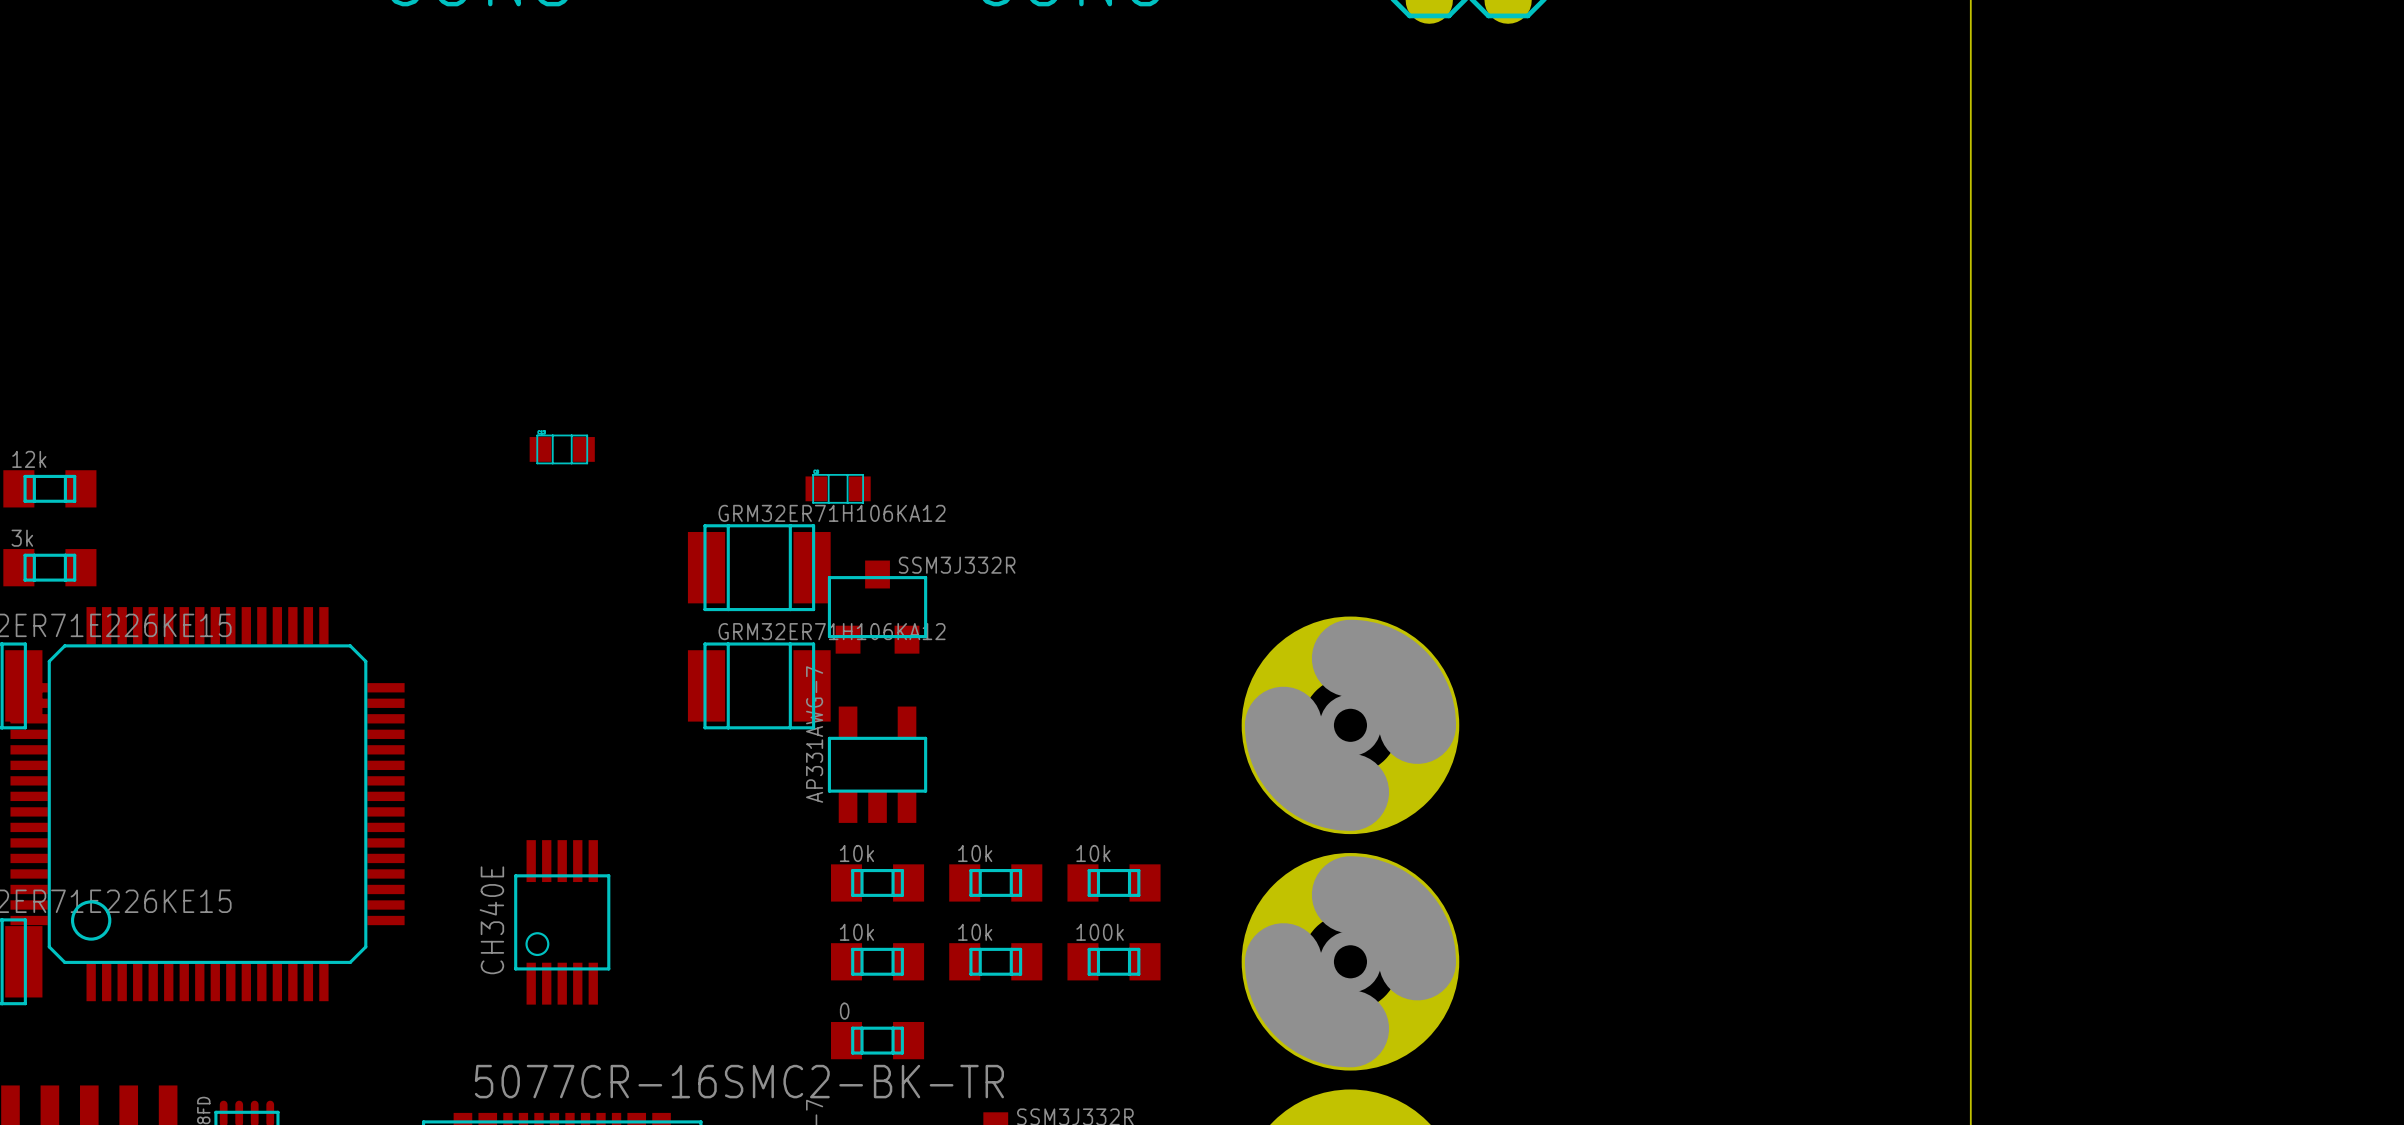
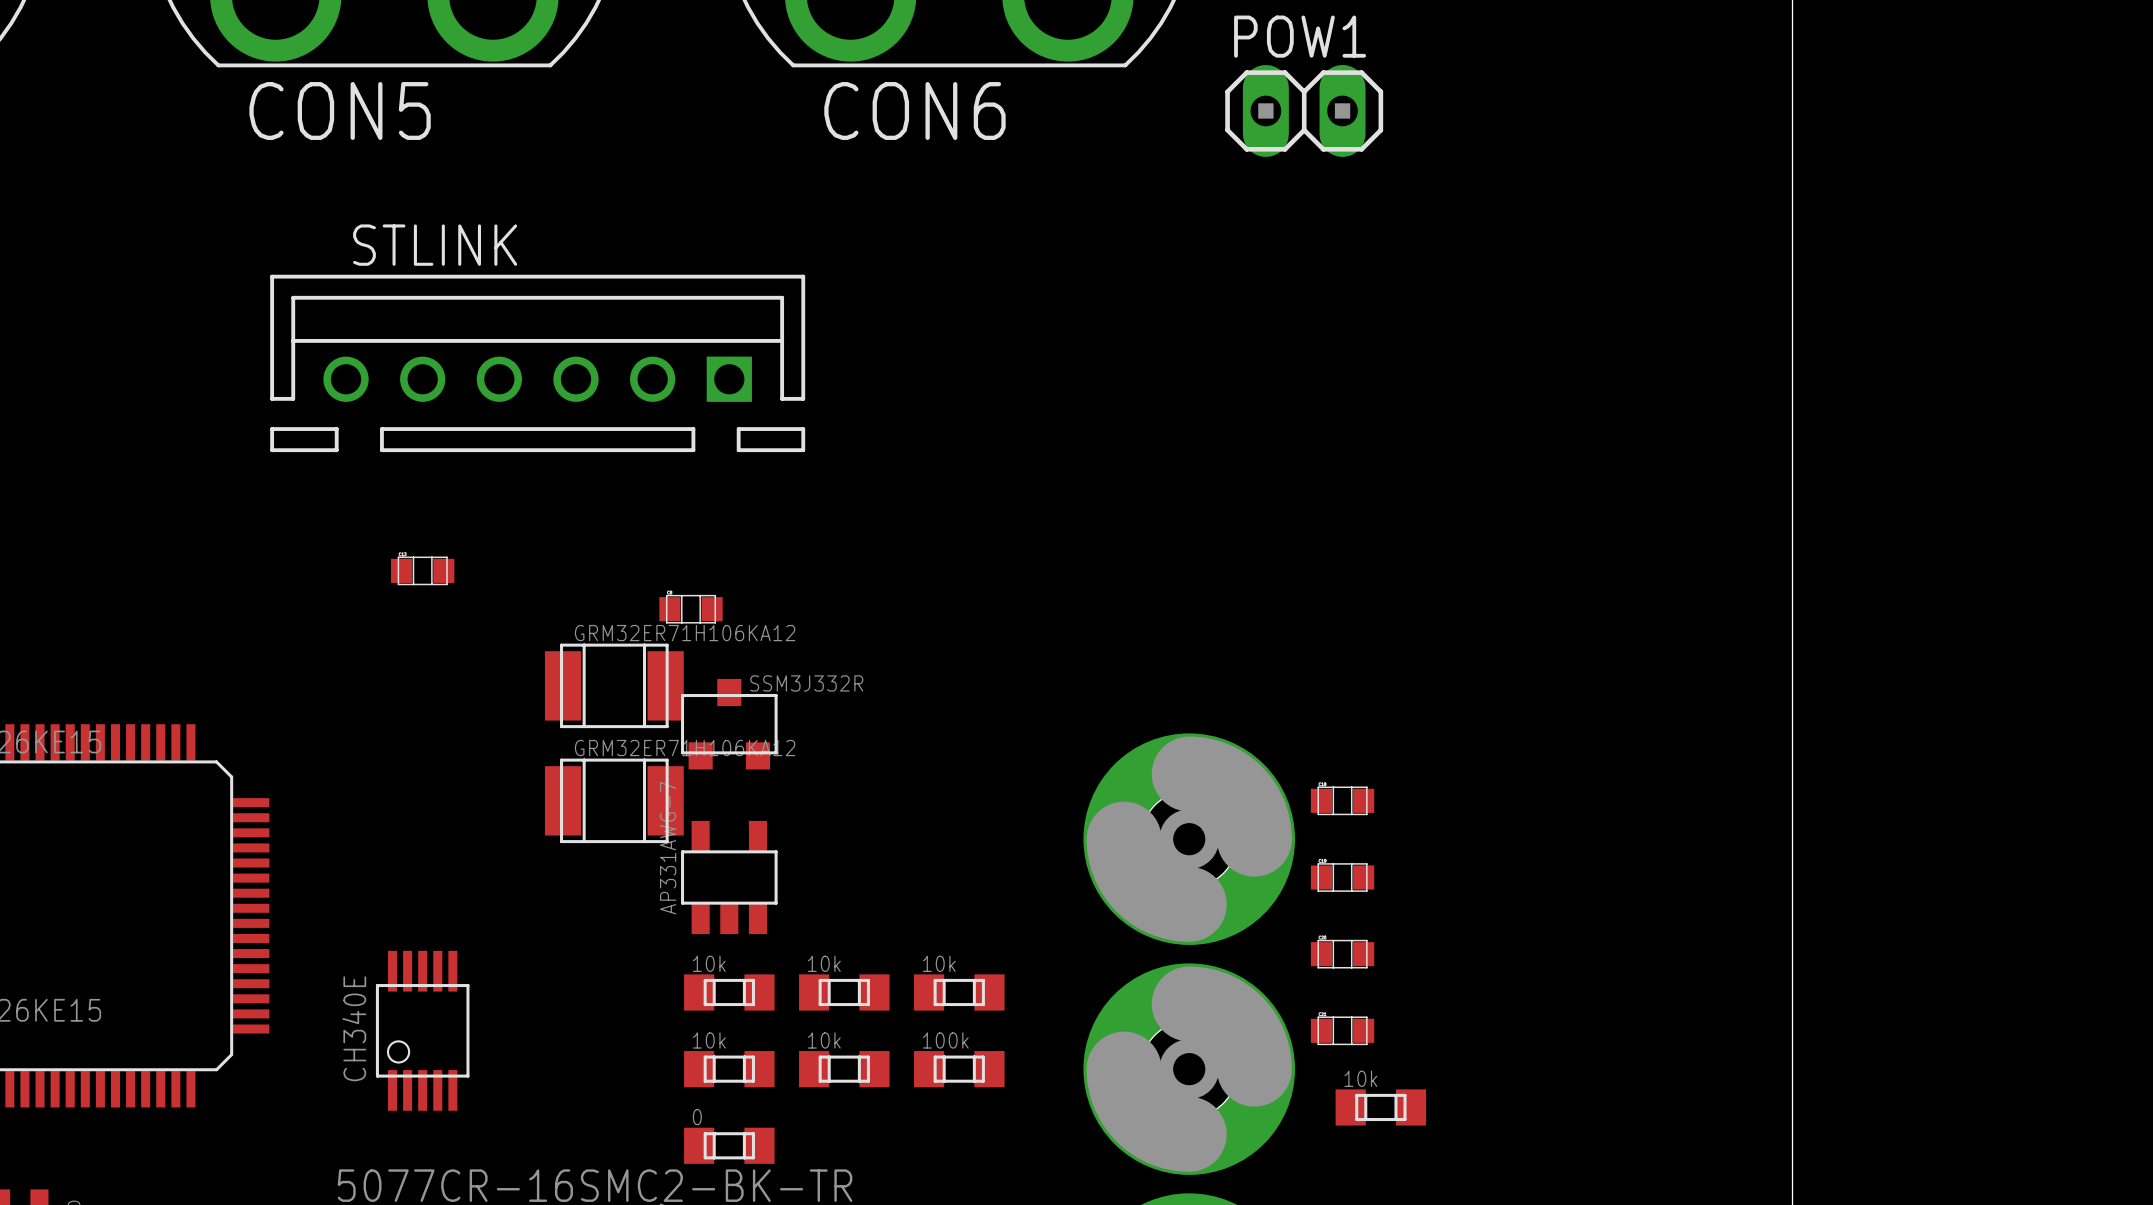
STLINK: none -> (537, 363)
part: none -> (1342, 800)
part: none -> (1342, 877)
part: none -> (1342, 954)
part: none -> (1342, 1030)
part: none -> 10k (1380, 1107)

